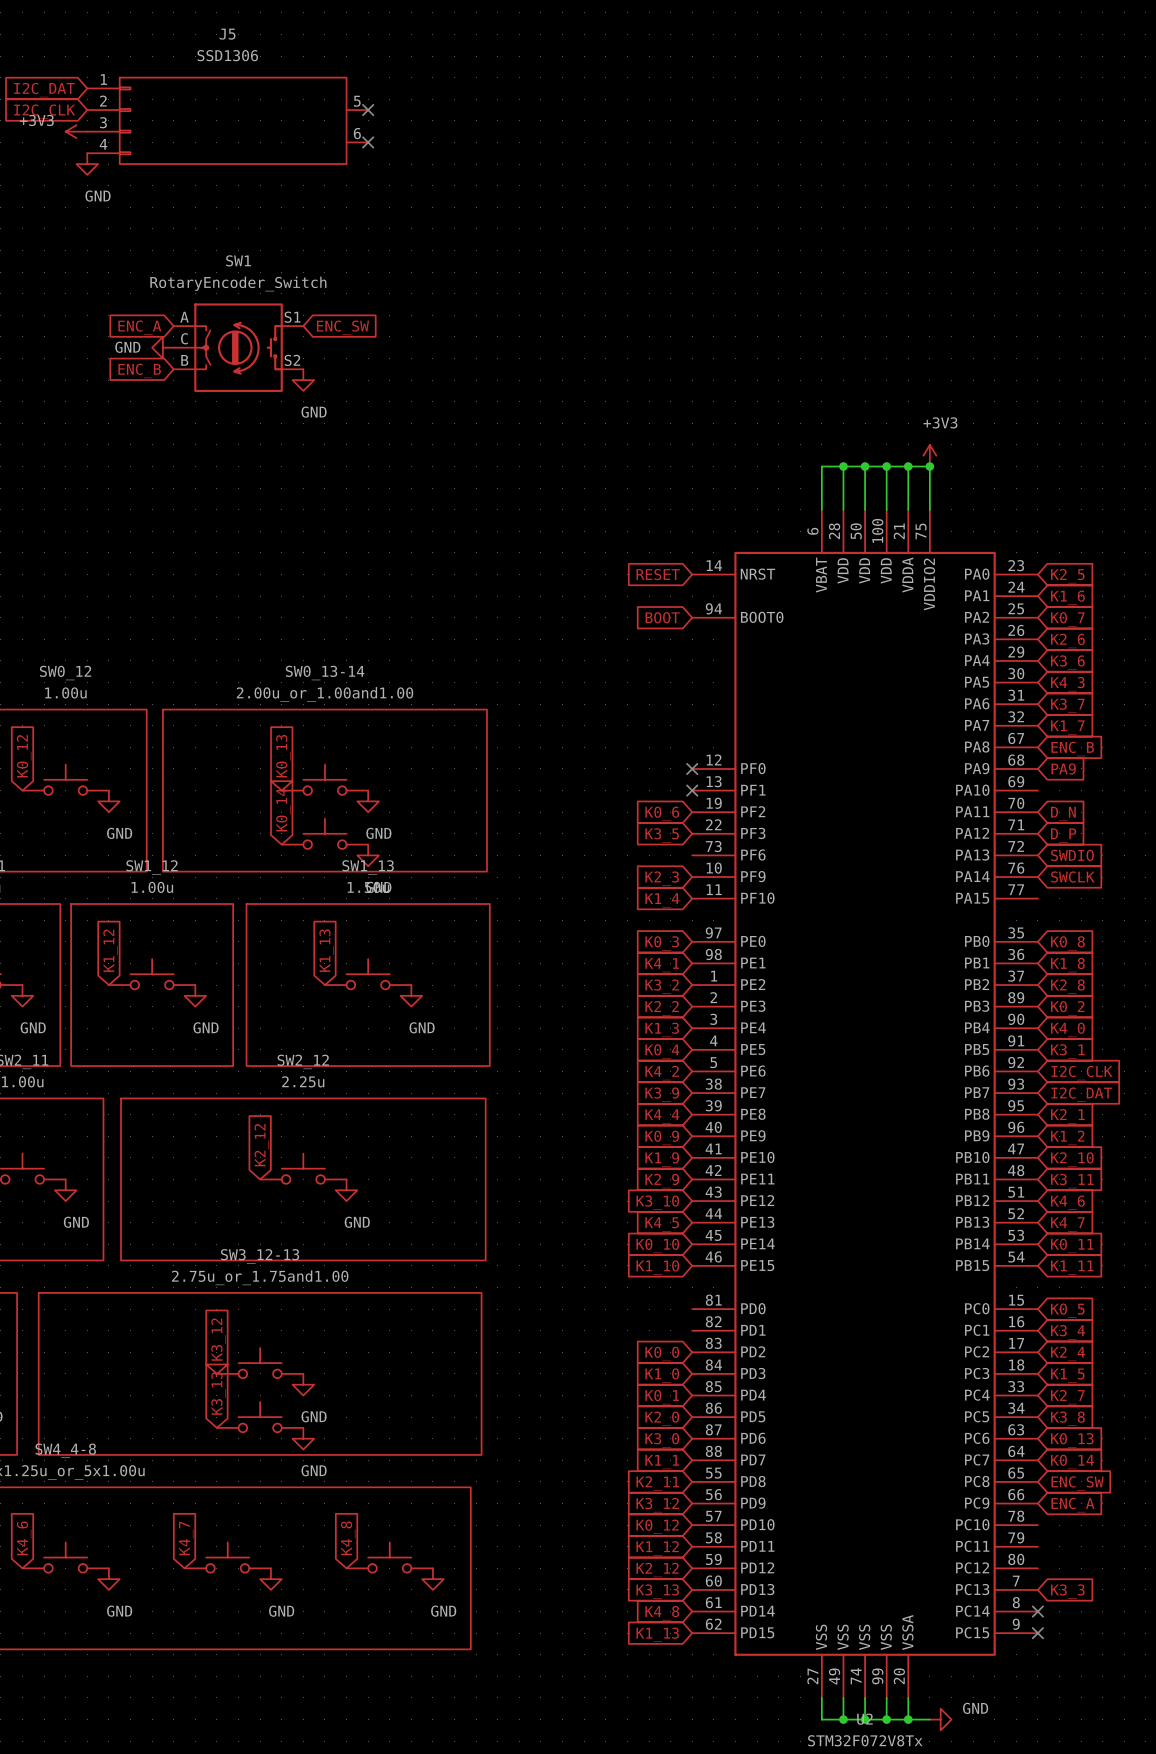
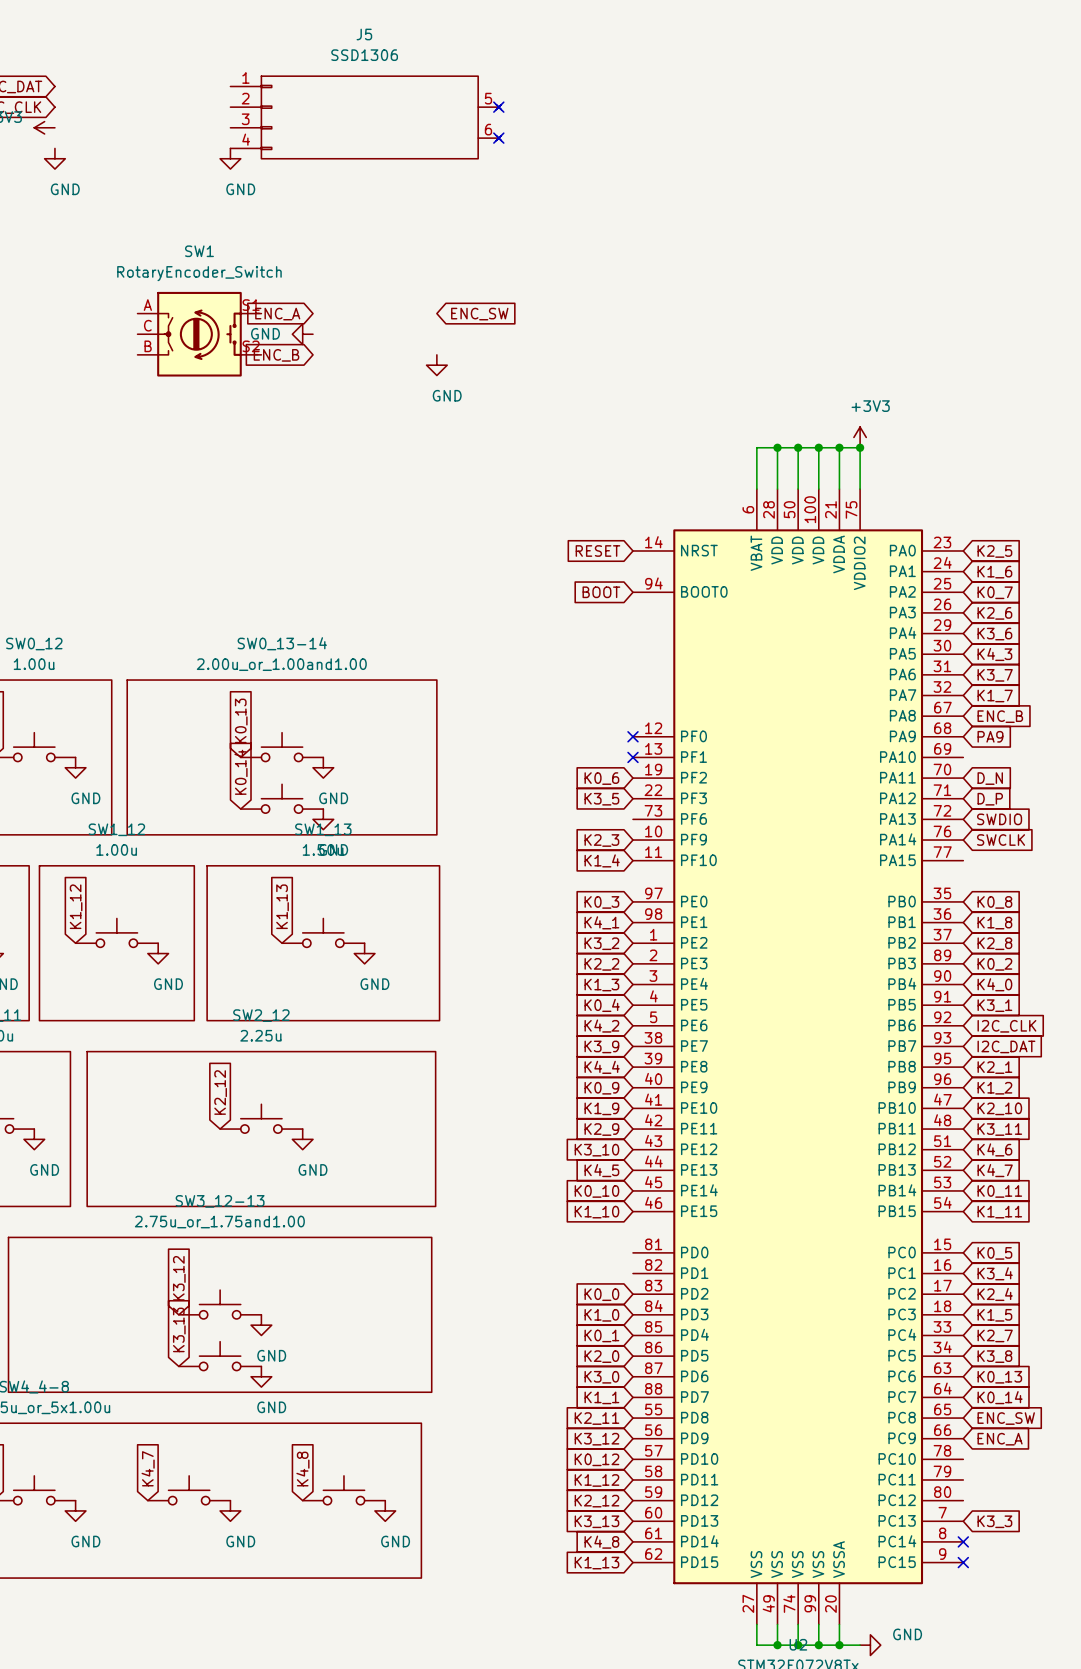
J5 symbol: [87, 77, 369, 165] -> [230, 76, 502, 159]
no-connect mark: (368, 110) -> none
no-connect mark: none -> (498, 107)
no-connect mark: (368, 142) -> none
no-connect mark: none -> (498, 138)
power symbol: none -> GND (230, 158)
global label position: ENC_A (139, 327) -> ENC_A (277, 314)
global label position: ENC_SW (342, 327) -> ENC_SW (479, 314)
power symbol: GND (162, 347) -> none
global label position: ENC_B (139, 370) -> ENC_B (276, 355)
power symbol rotation: 0° (303, 380) -> 90° clockwise (302, 334)
power symbol position: GND (303, 380) -> GND (302, 334)
power symbol: none -> GND (436, 365)

